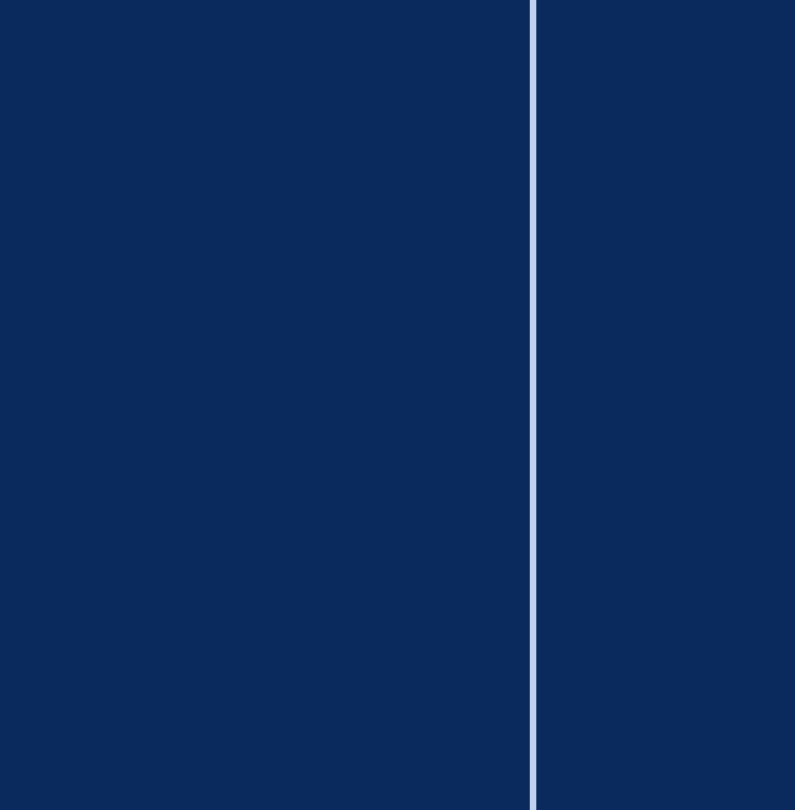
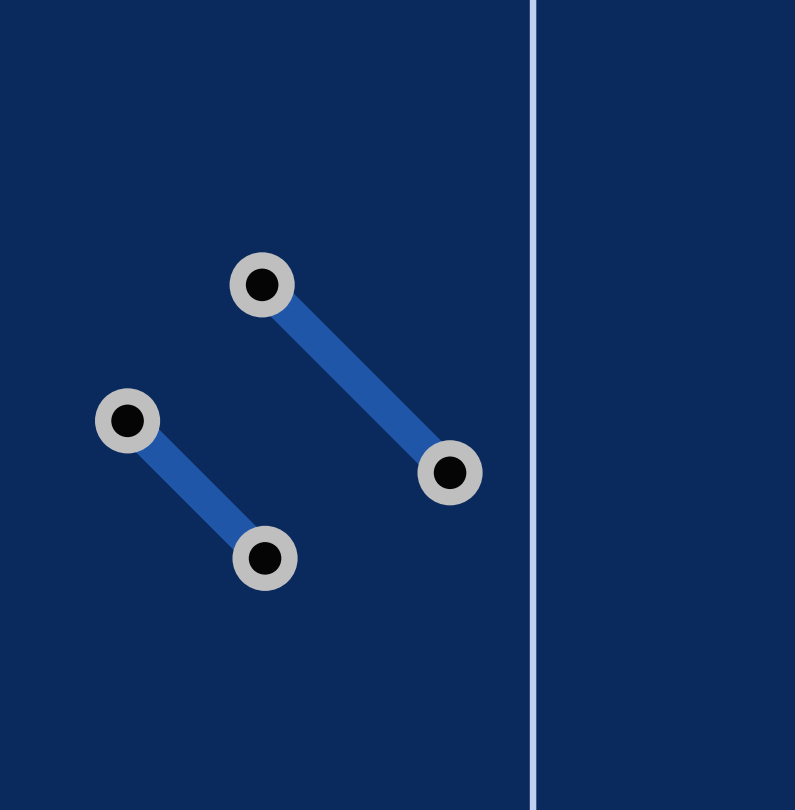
track: none -> (262, 284) (450, 472)
via: none -> (262, 284)
track: none -> (127, 420) (265, 558)
via: none -> (127, 420)
via: none -> (450, 472)
via: none -> (265, 558)

